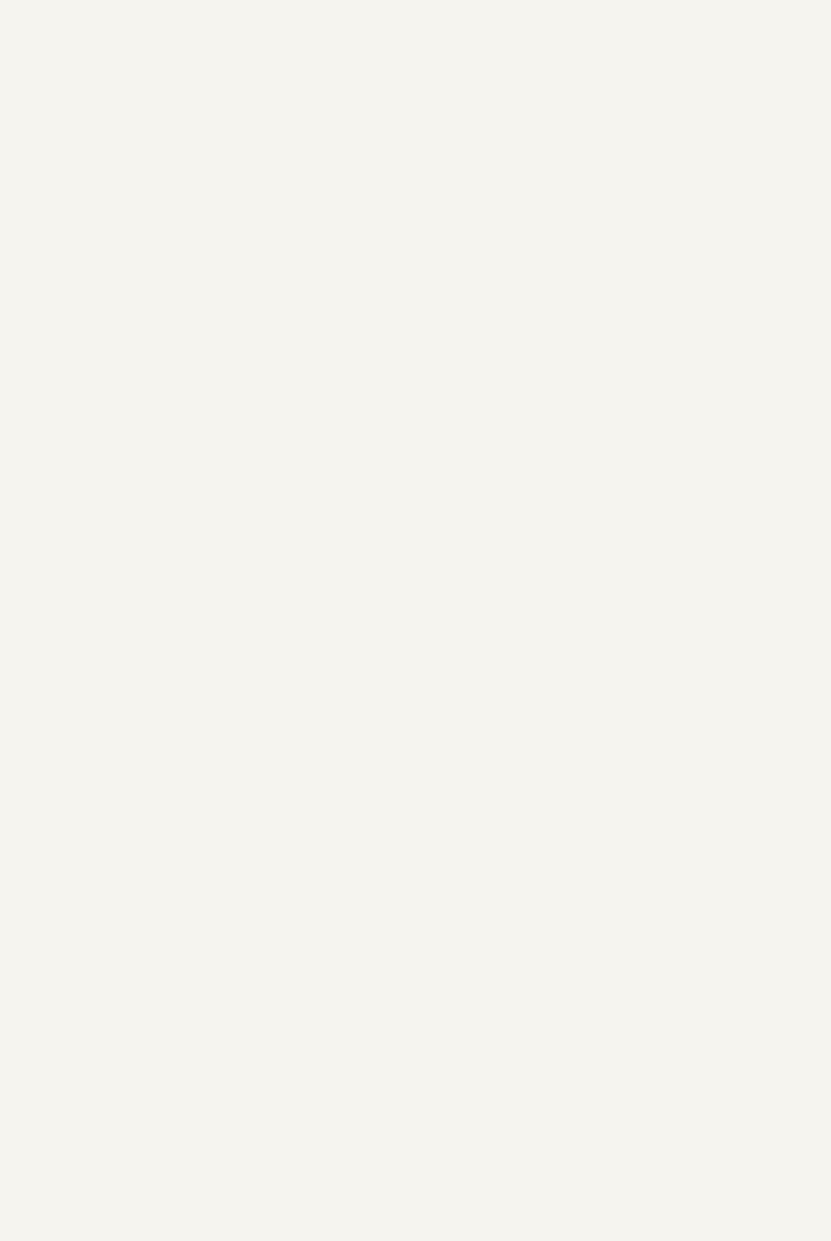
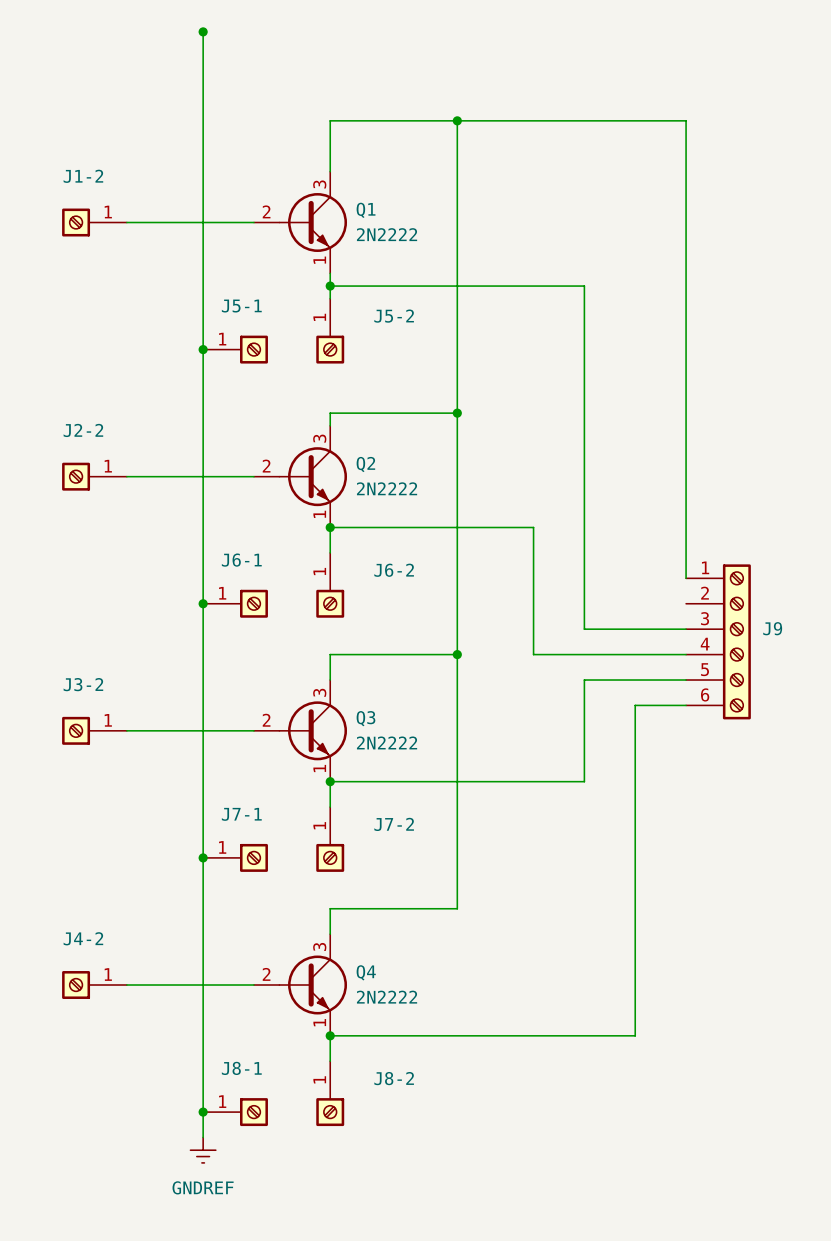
wire: none -> (203, 31) (203, 1137)
junction: none -> (203, 31)
wire: none -> (457, 120) (457, 908) (330, 908) (330, 934)
junction: none -> (457, 120)
wire: none -> (330, 171) (330, 120) (686, 120) (686, 578)
J1-2: none -> (94, 222)
wire: none -> (126, 222) (253, 222)
Q1: none -> 2N2222 (300, 222)
wire: none -> (330, 273) (330, 298)
wire: none -> (330, 286) (584, 286) (584, 629) (686, 629)
junction: none -> (330, 286)
J5-2: none -> (330, 331)
junction: none -> (203, 349)
J5-1: none -> (235, 349)
wire: none -> (457, 413) (330, 413) (330, 425)
junction: none -> (457, 413)
J2-2: none -> (94, 476)
wire: none -> (126, 476) (253, 476)
Q2: none -> 2N2222 (300, 476)
junction: none -> (330, 527)
wire: none -> (330, 552) (330, 527) (533, 527) (533, 654) (686, 654)
J6-2: none -> (330, 585)
junction: none -> (203, 603)
J6-1: none -> (235, 603)
J9: none -> (718, 641)
wire: none -> (457, 654) (330, 654) (330, 680)
junction: none -> (457, 654)
wire: none -> (686, 680) (584, 680) (584, 781) (330, 781) (330, 807)
wire: none -> (686, 705) (635, 705) (635, 1035) (330, 1035) (330, 1061)
J3-2: none -> (94, 730)
wire: none -> (126, 730) (253, 730)
Q3: none -> 2N2222 (300, 730)
junction: none -> (330, 781)
J7-2: none -> (330, 839)
junction: none -> (203, 857)
J7-1: none -> (235, 857)
J4-2: none -> (94, 985)
wire: none -> (126, 985) (253, 985)
Q4: none -> 2N2222 (300, 985)
junction: none -> (330, 1035)
J8-2: none -> (330, 1093)
junction: none -> (203, 1112)
J8-1: none -> (235, 1112)
power symbol: none -> GNDREF (203, 1150)

